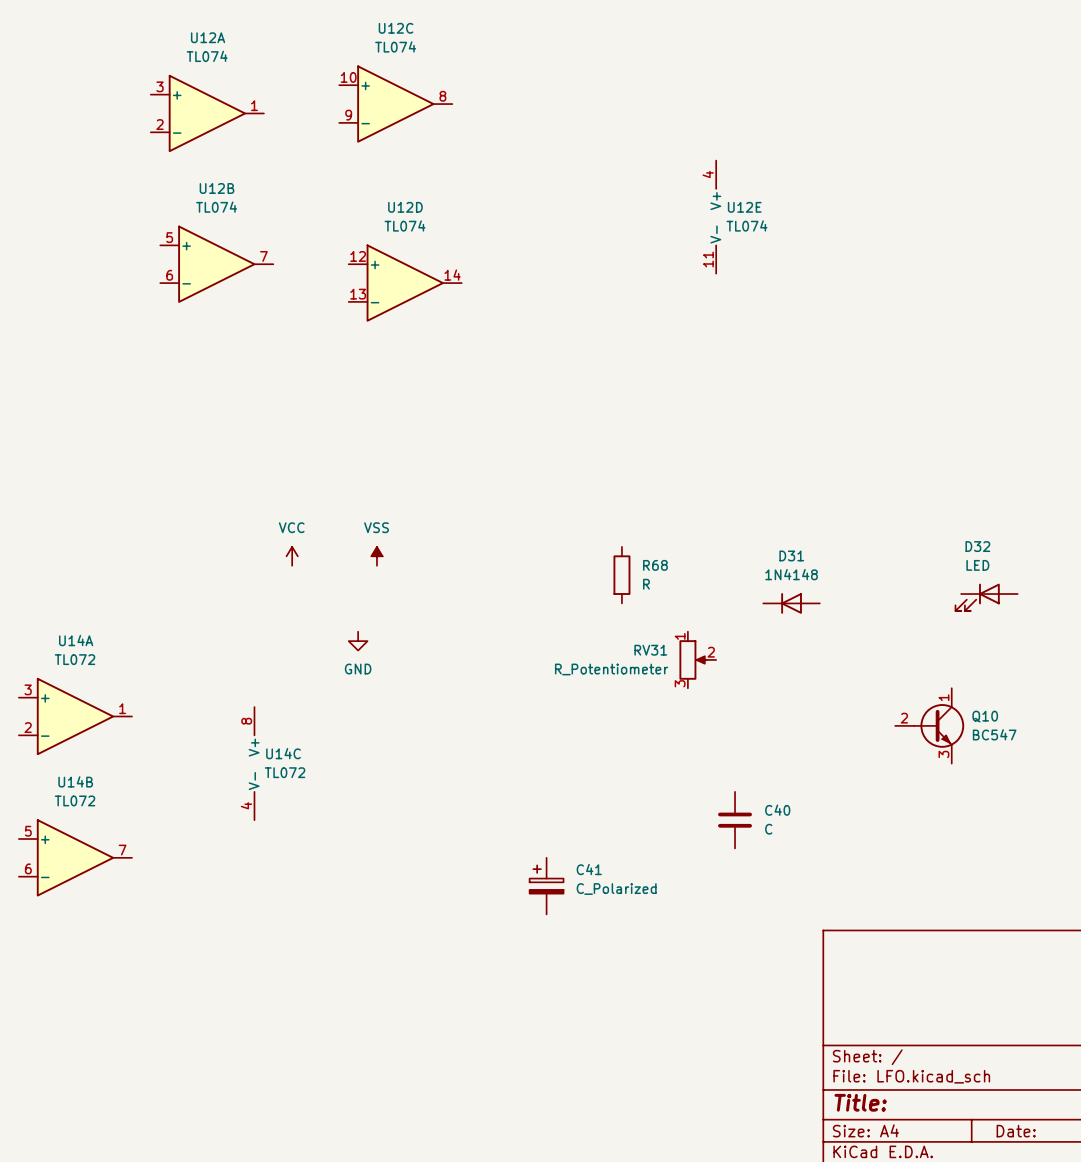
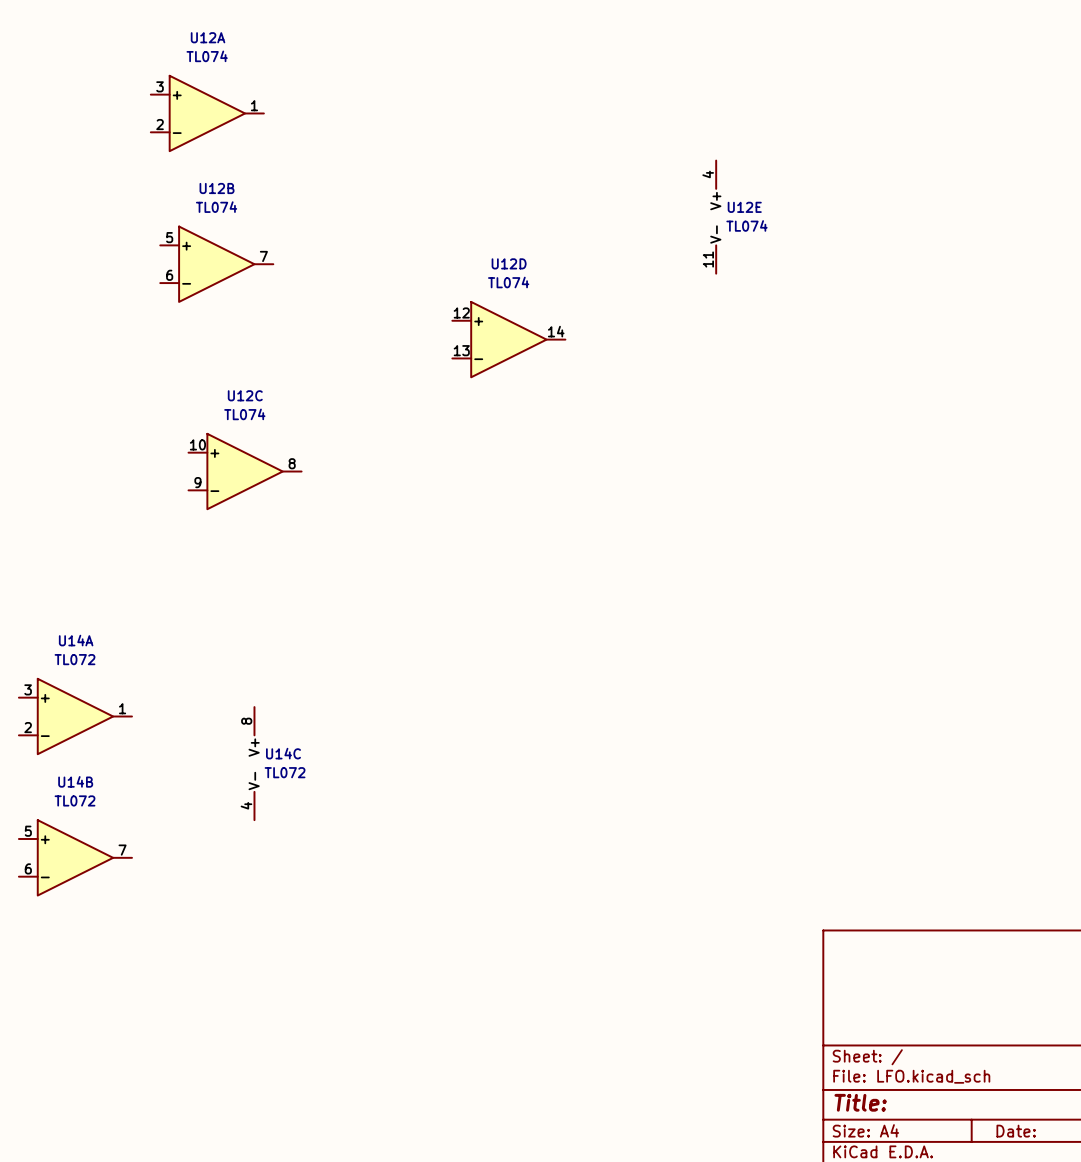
U12C position: (395, 104) -> (245, 471)
U12D position: (405, 283) -> (508, 339)
power symbol: VCC (292, 556) -> none
power symbol: VSS (376, 556) -> none
R68: R (621, 575) -> none
D32: LED (986, 597) -> none
D31: 1N4148 (791, 603) -> none
power symbol: GND (358, 641) -> none
RV31: R_Potentiometer (697, 659) -> none
Q10: BC547 (929, 725) -> none
C40: C (735, 820) -> none
C41: C_Polarized (546, 886) -> none

